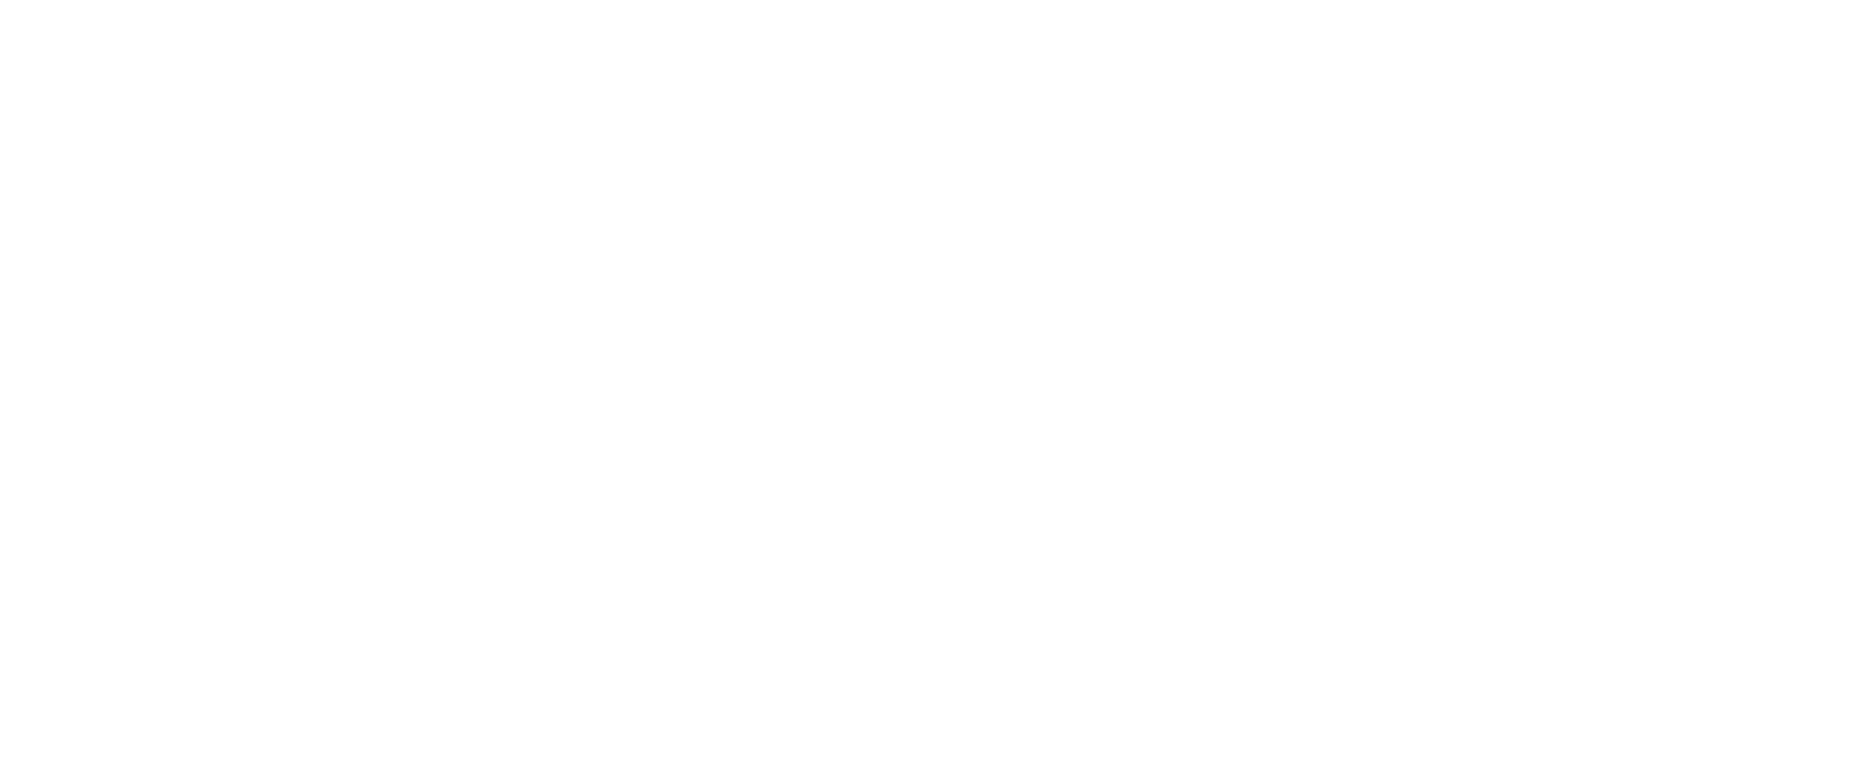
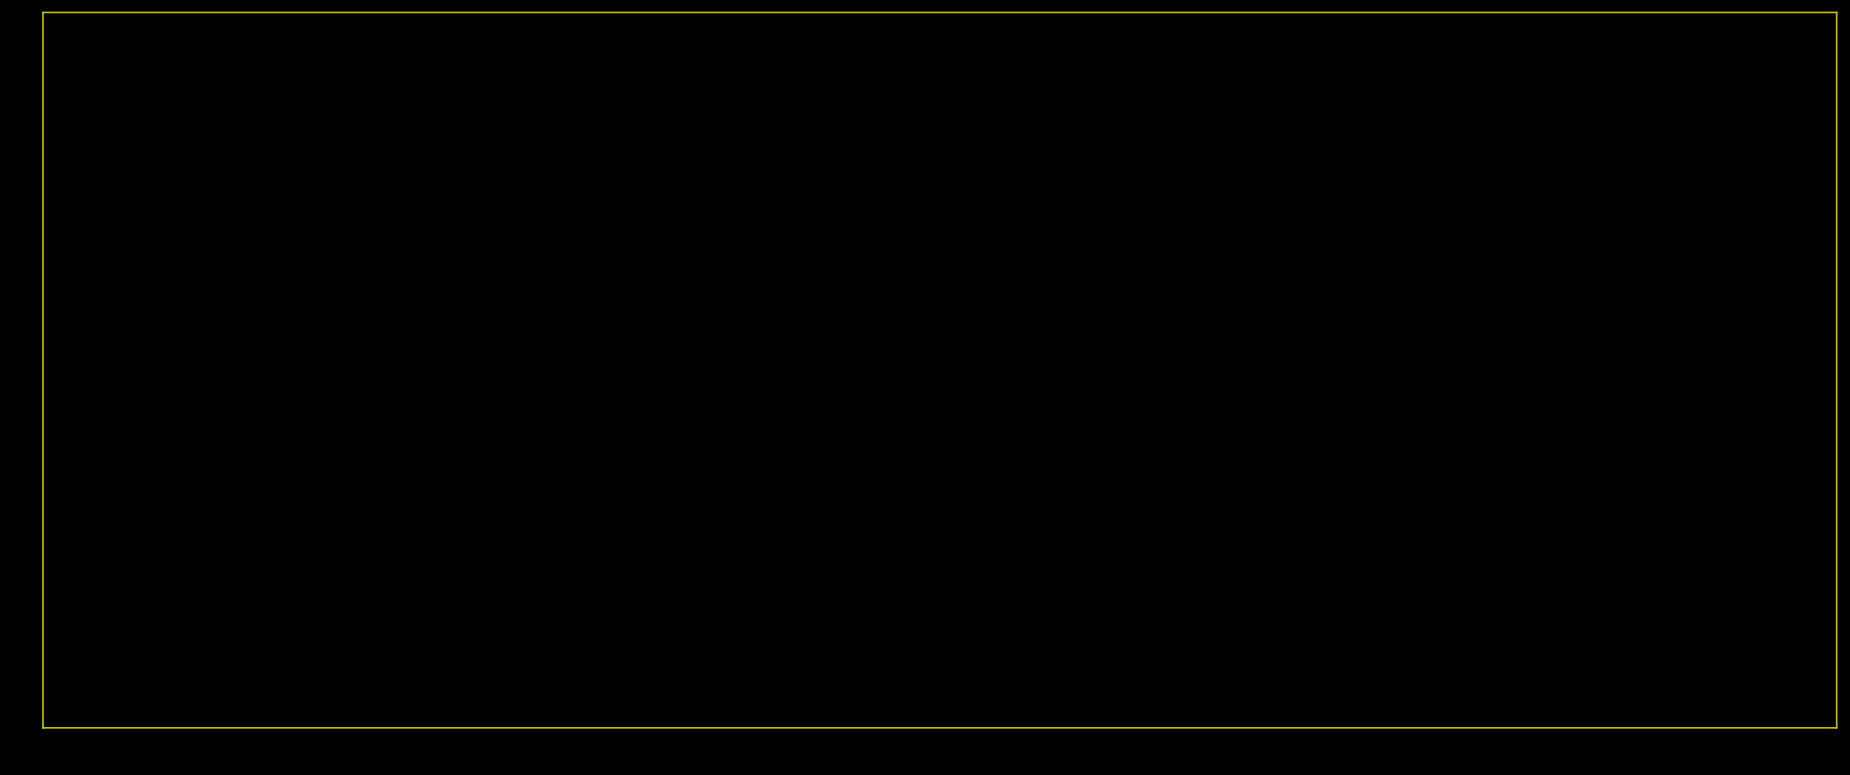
board edge: none -> (1836, 12) (43, 12) (43, 727) (1836, 727) (1836, 12)

